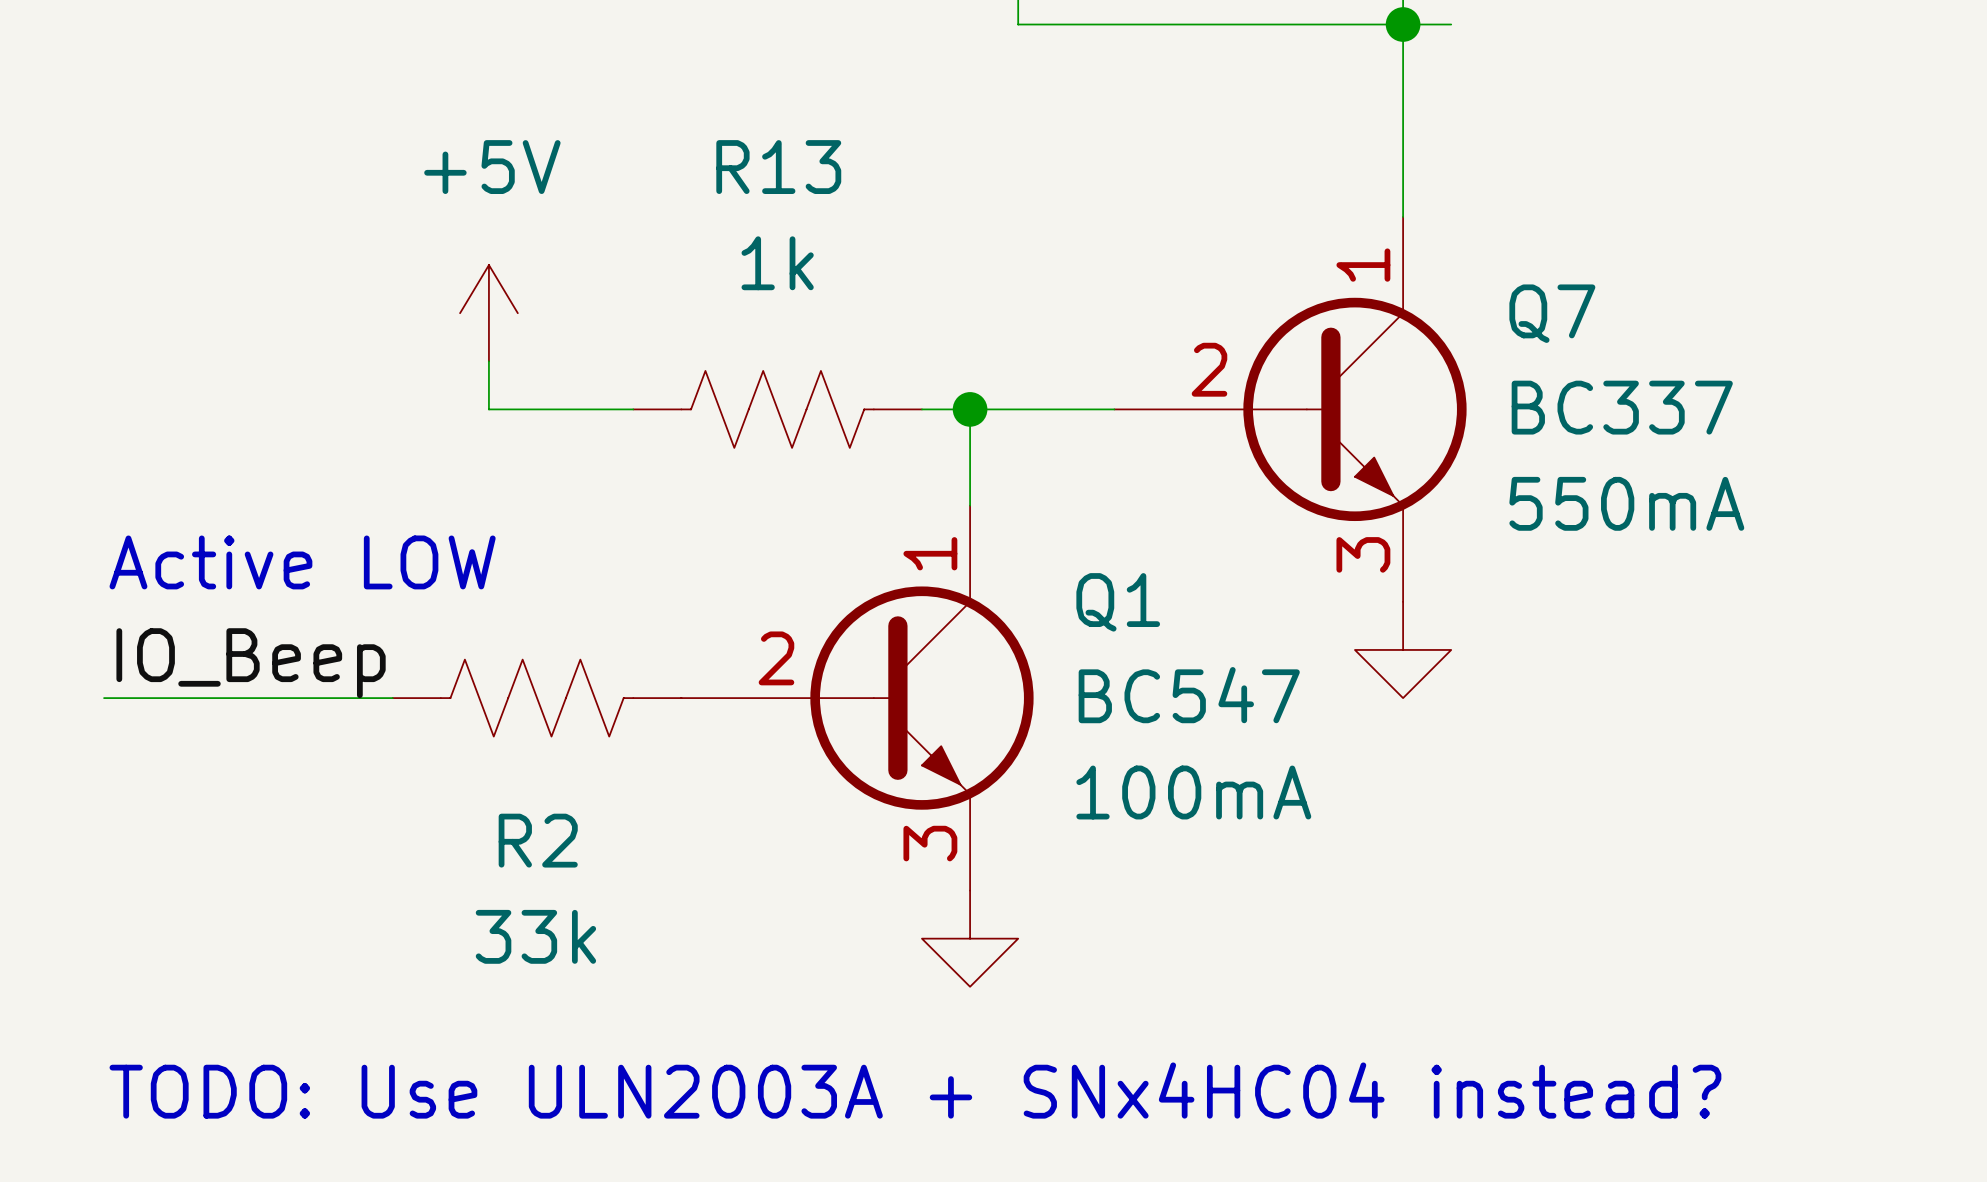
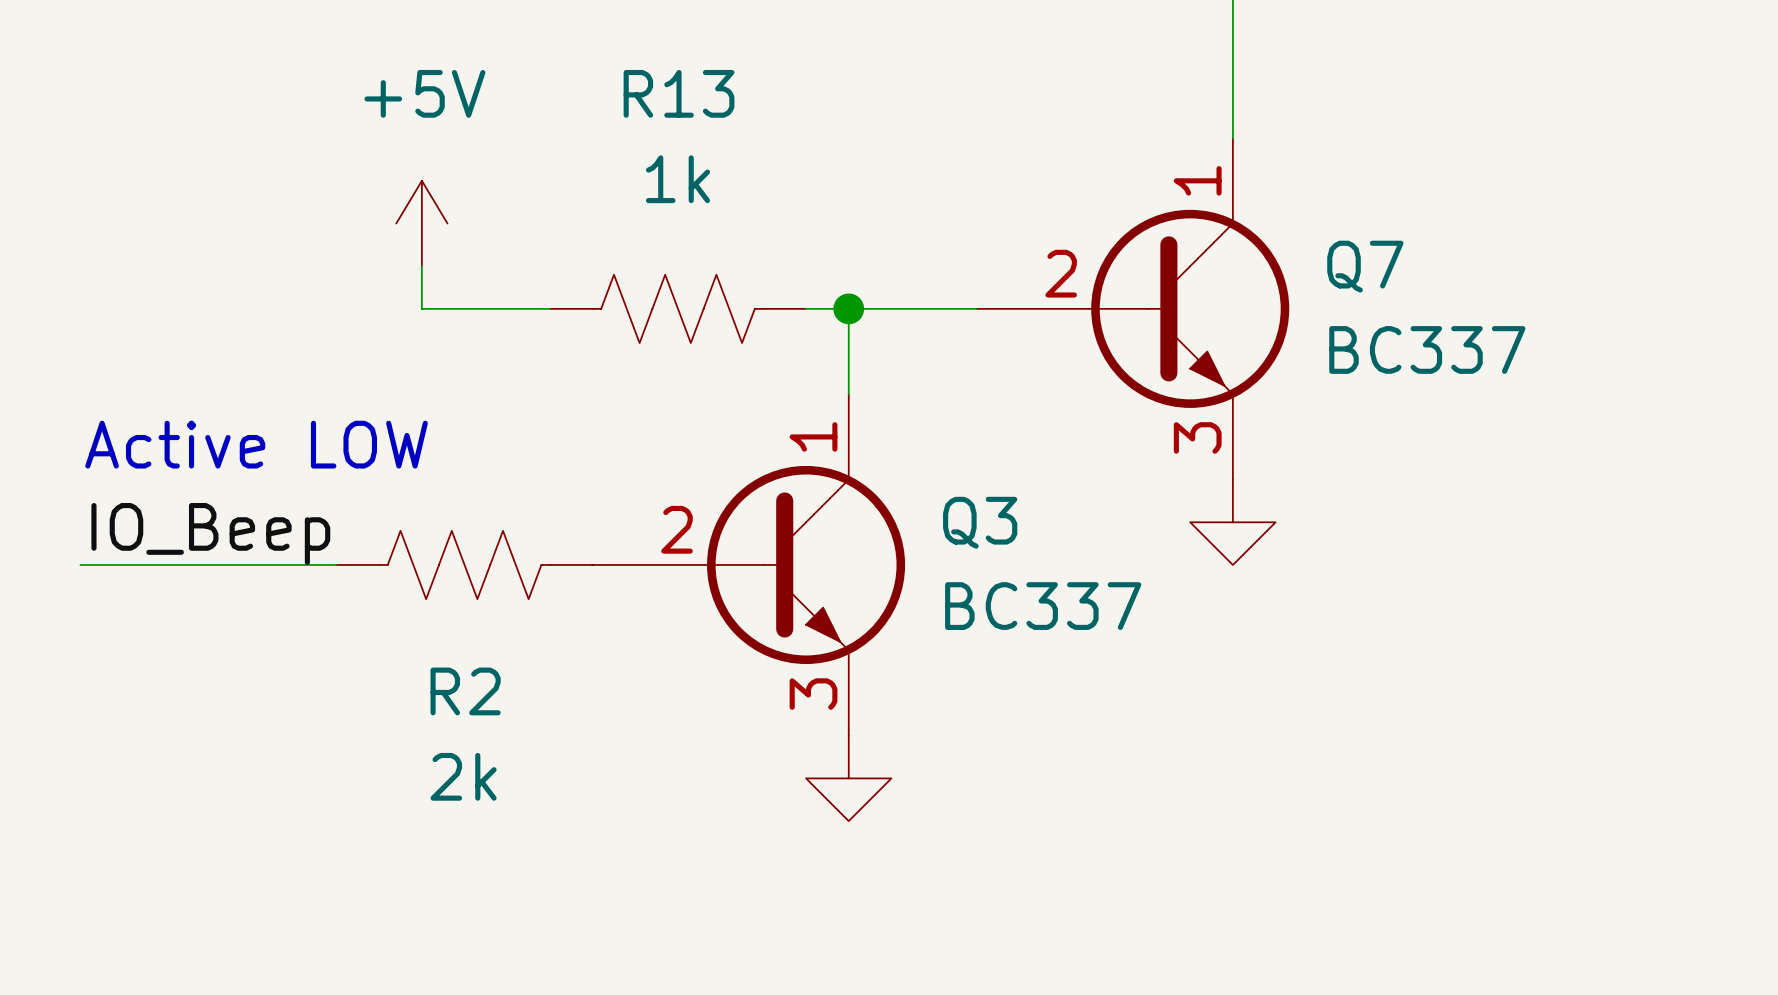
Q7 name position: Q7 (1552, 313) -> Q7 (1365, 266)
Q7 value position: BC337 (1622, 407) -> BC337 (1427, 349)
Q7 text: 550mA (1626, 503) -> none
Q1 name: Q1 (1118, 602) -> Q3 (980, 522)
Q1 value: BC547 (1189, 695) -> BC337 (1043, 606)
Q1 text: 100mA (1193, 792) -> none
R2 value: 33k (535, 936) -> 2k (463, 776)
text: TODO: Use ULN2003A + SNx4HC04 instead? (915, 1090) -> none

